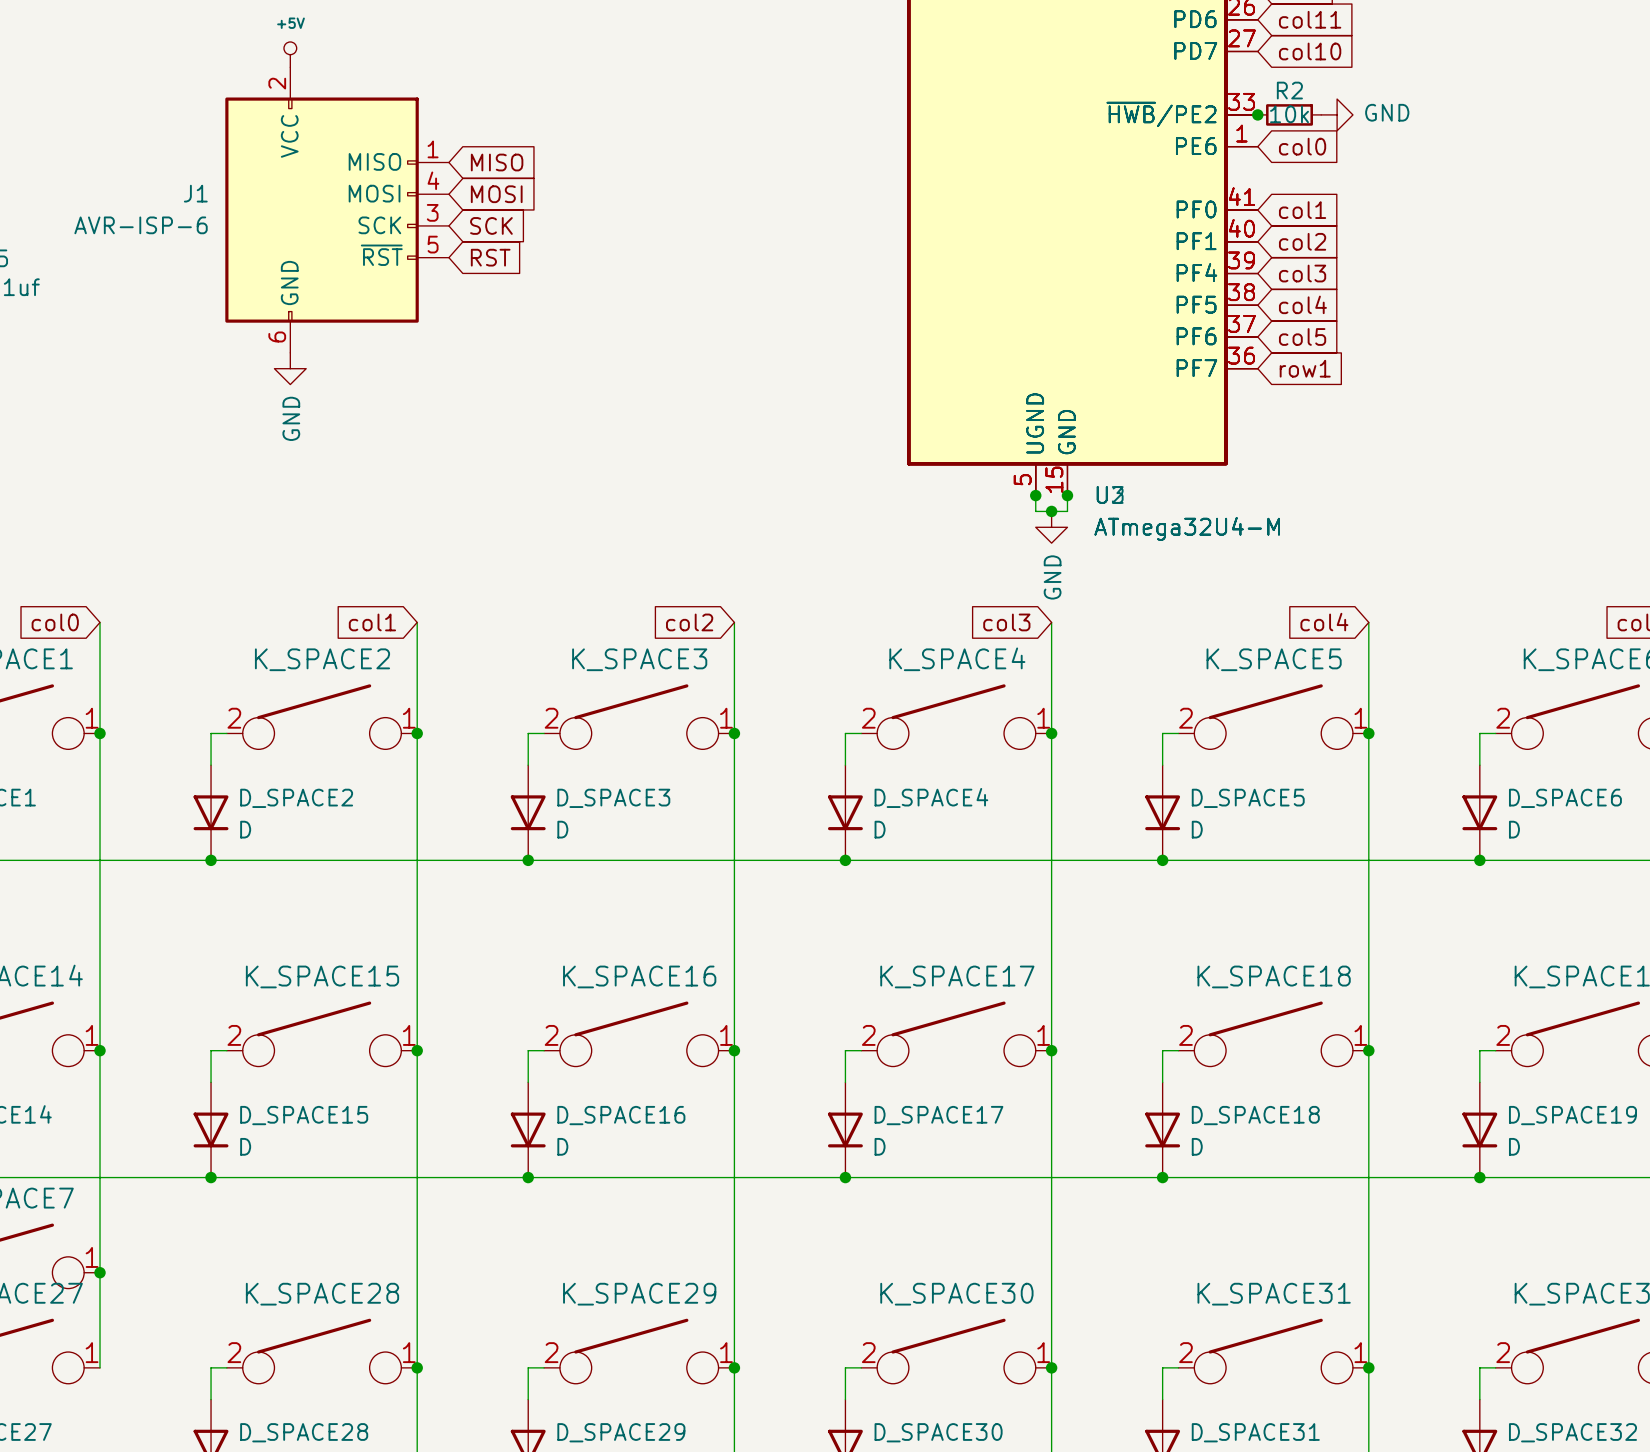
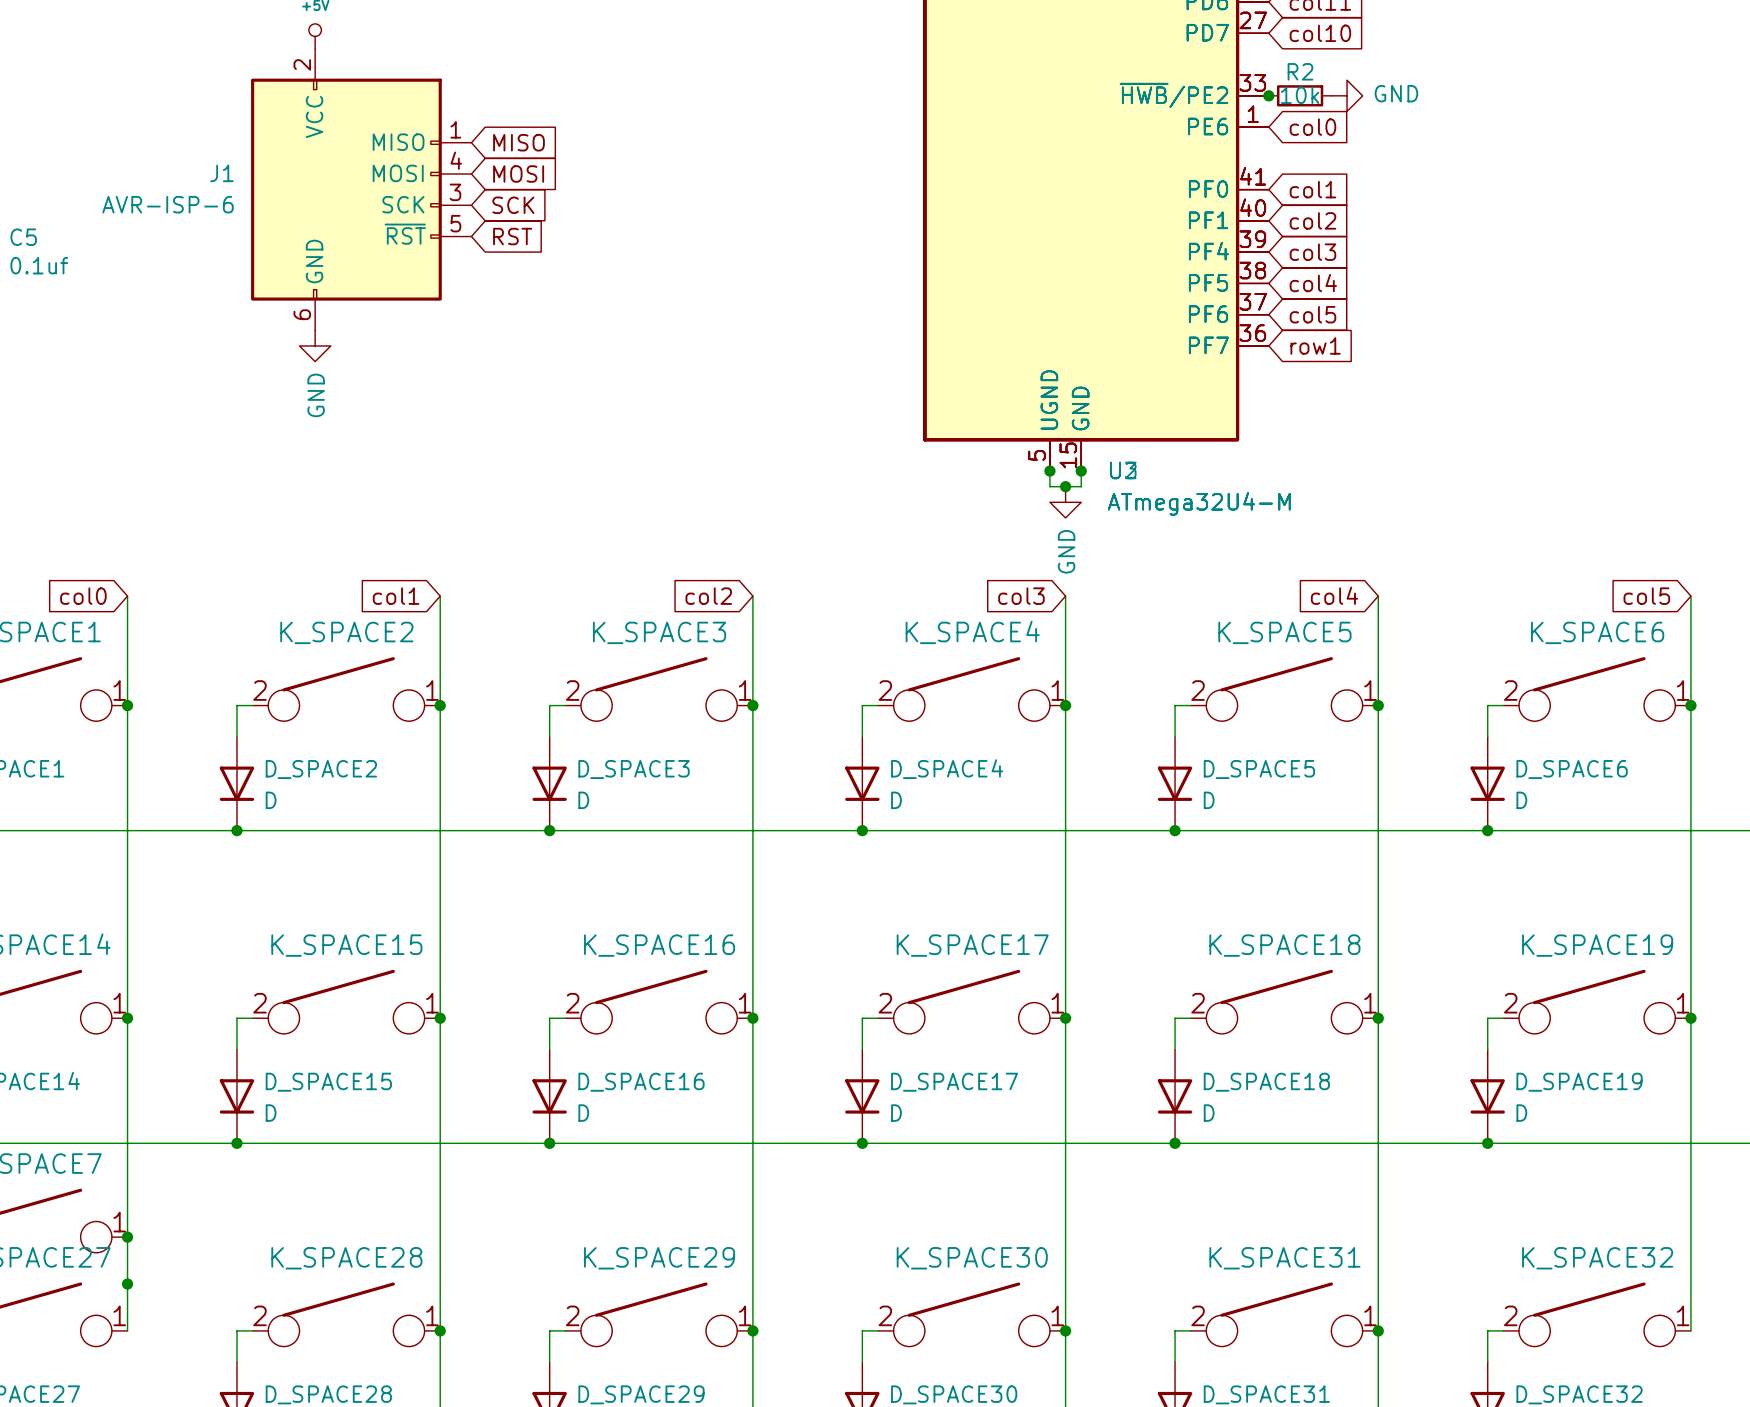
junction: none -> (127, 1284)

